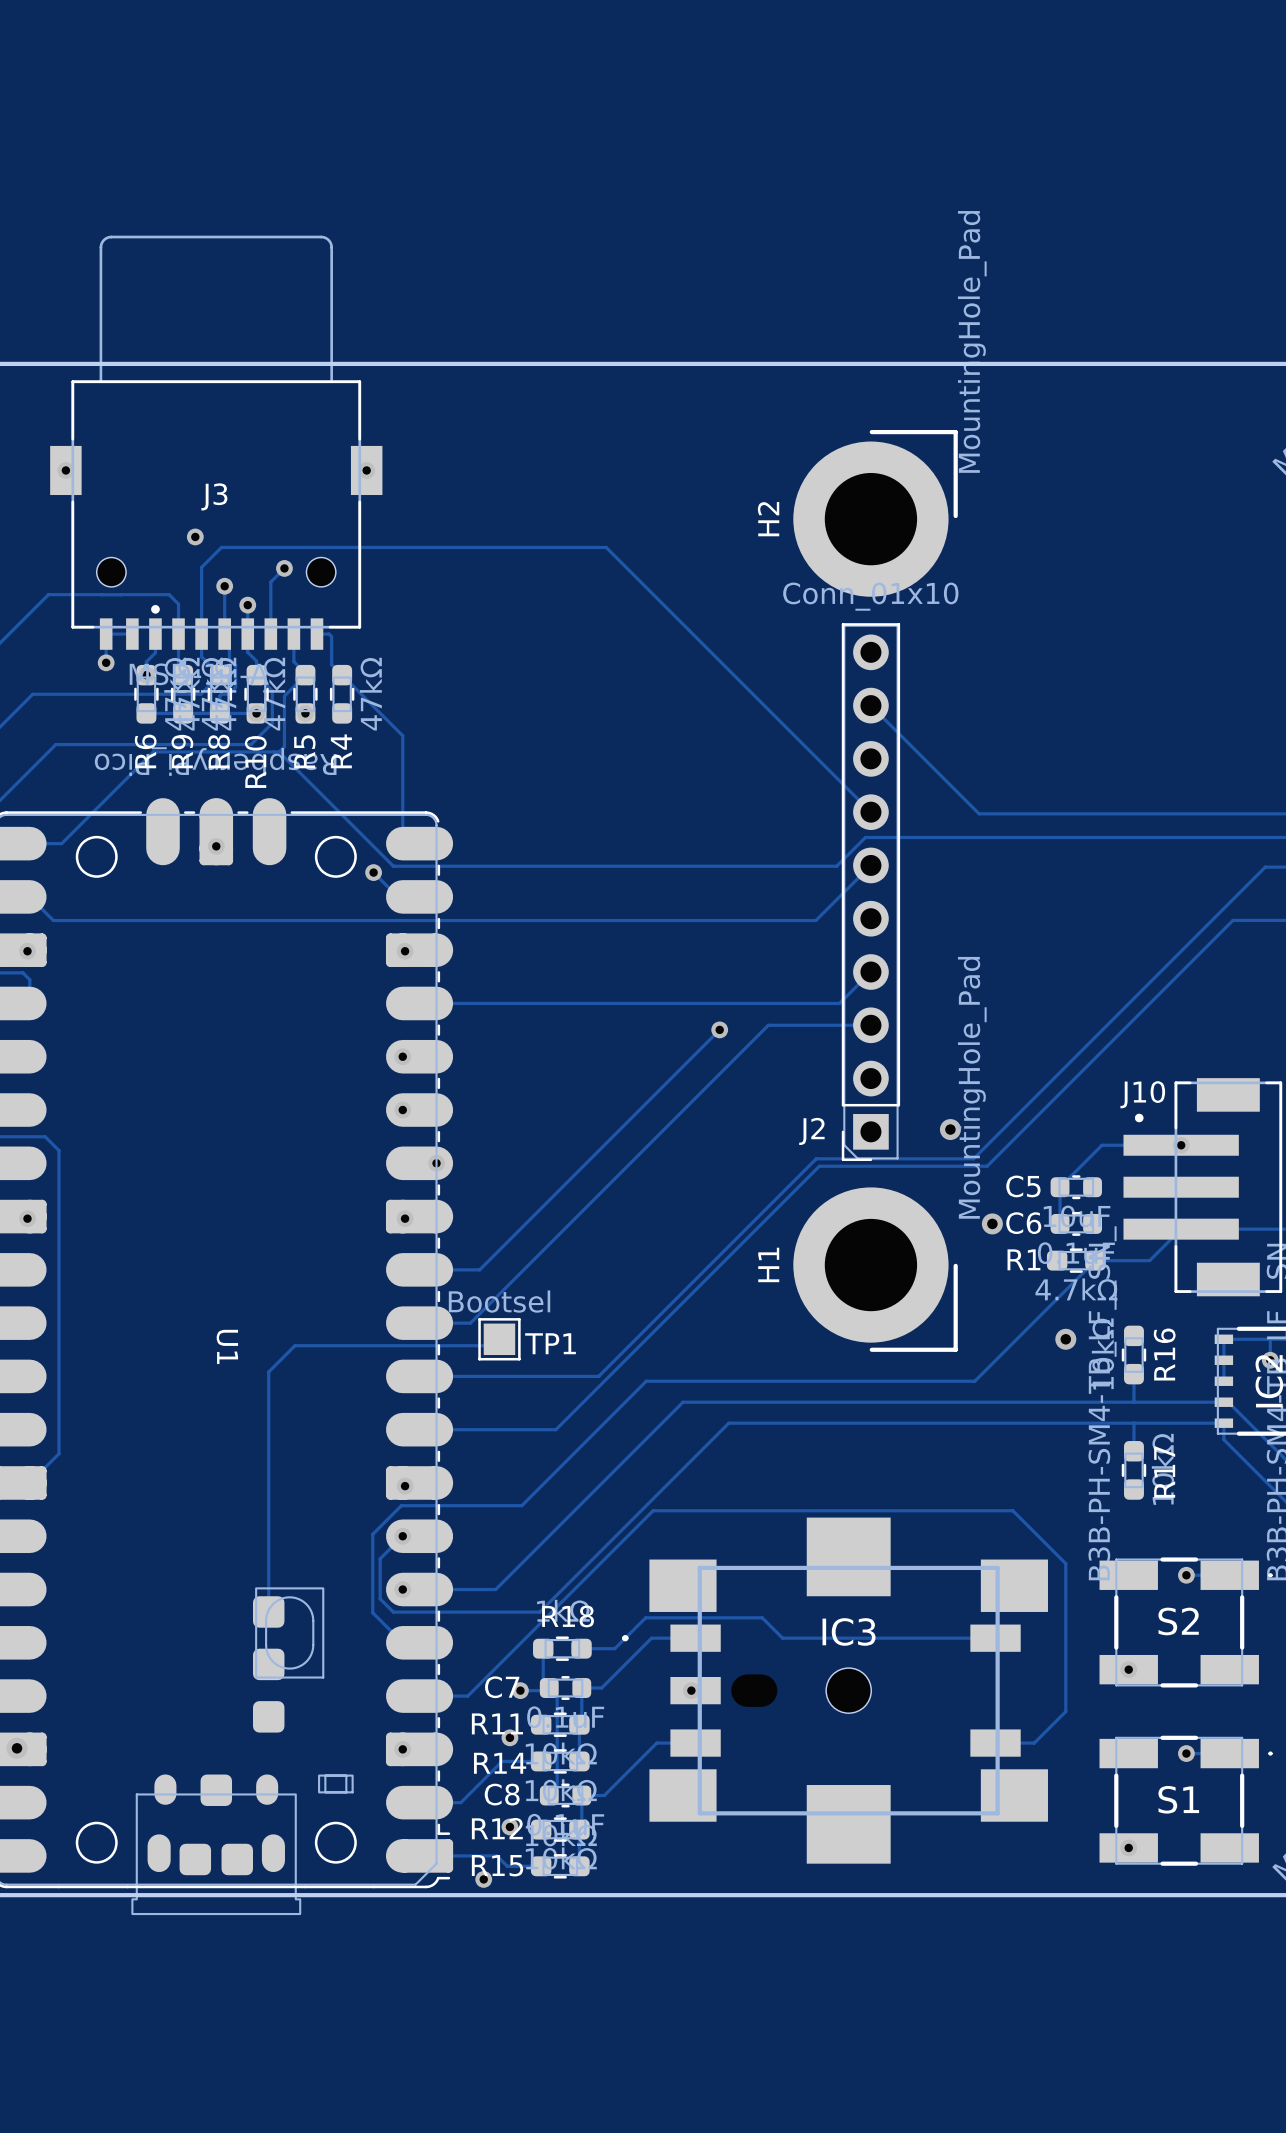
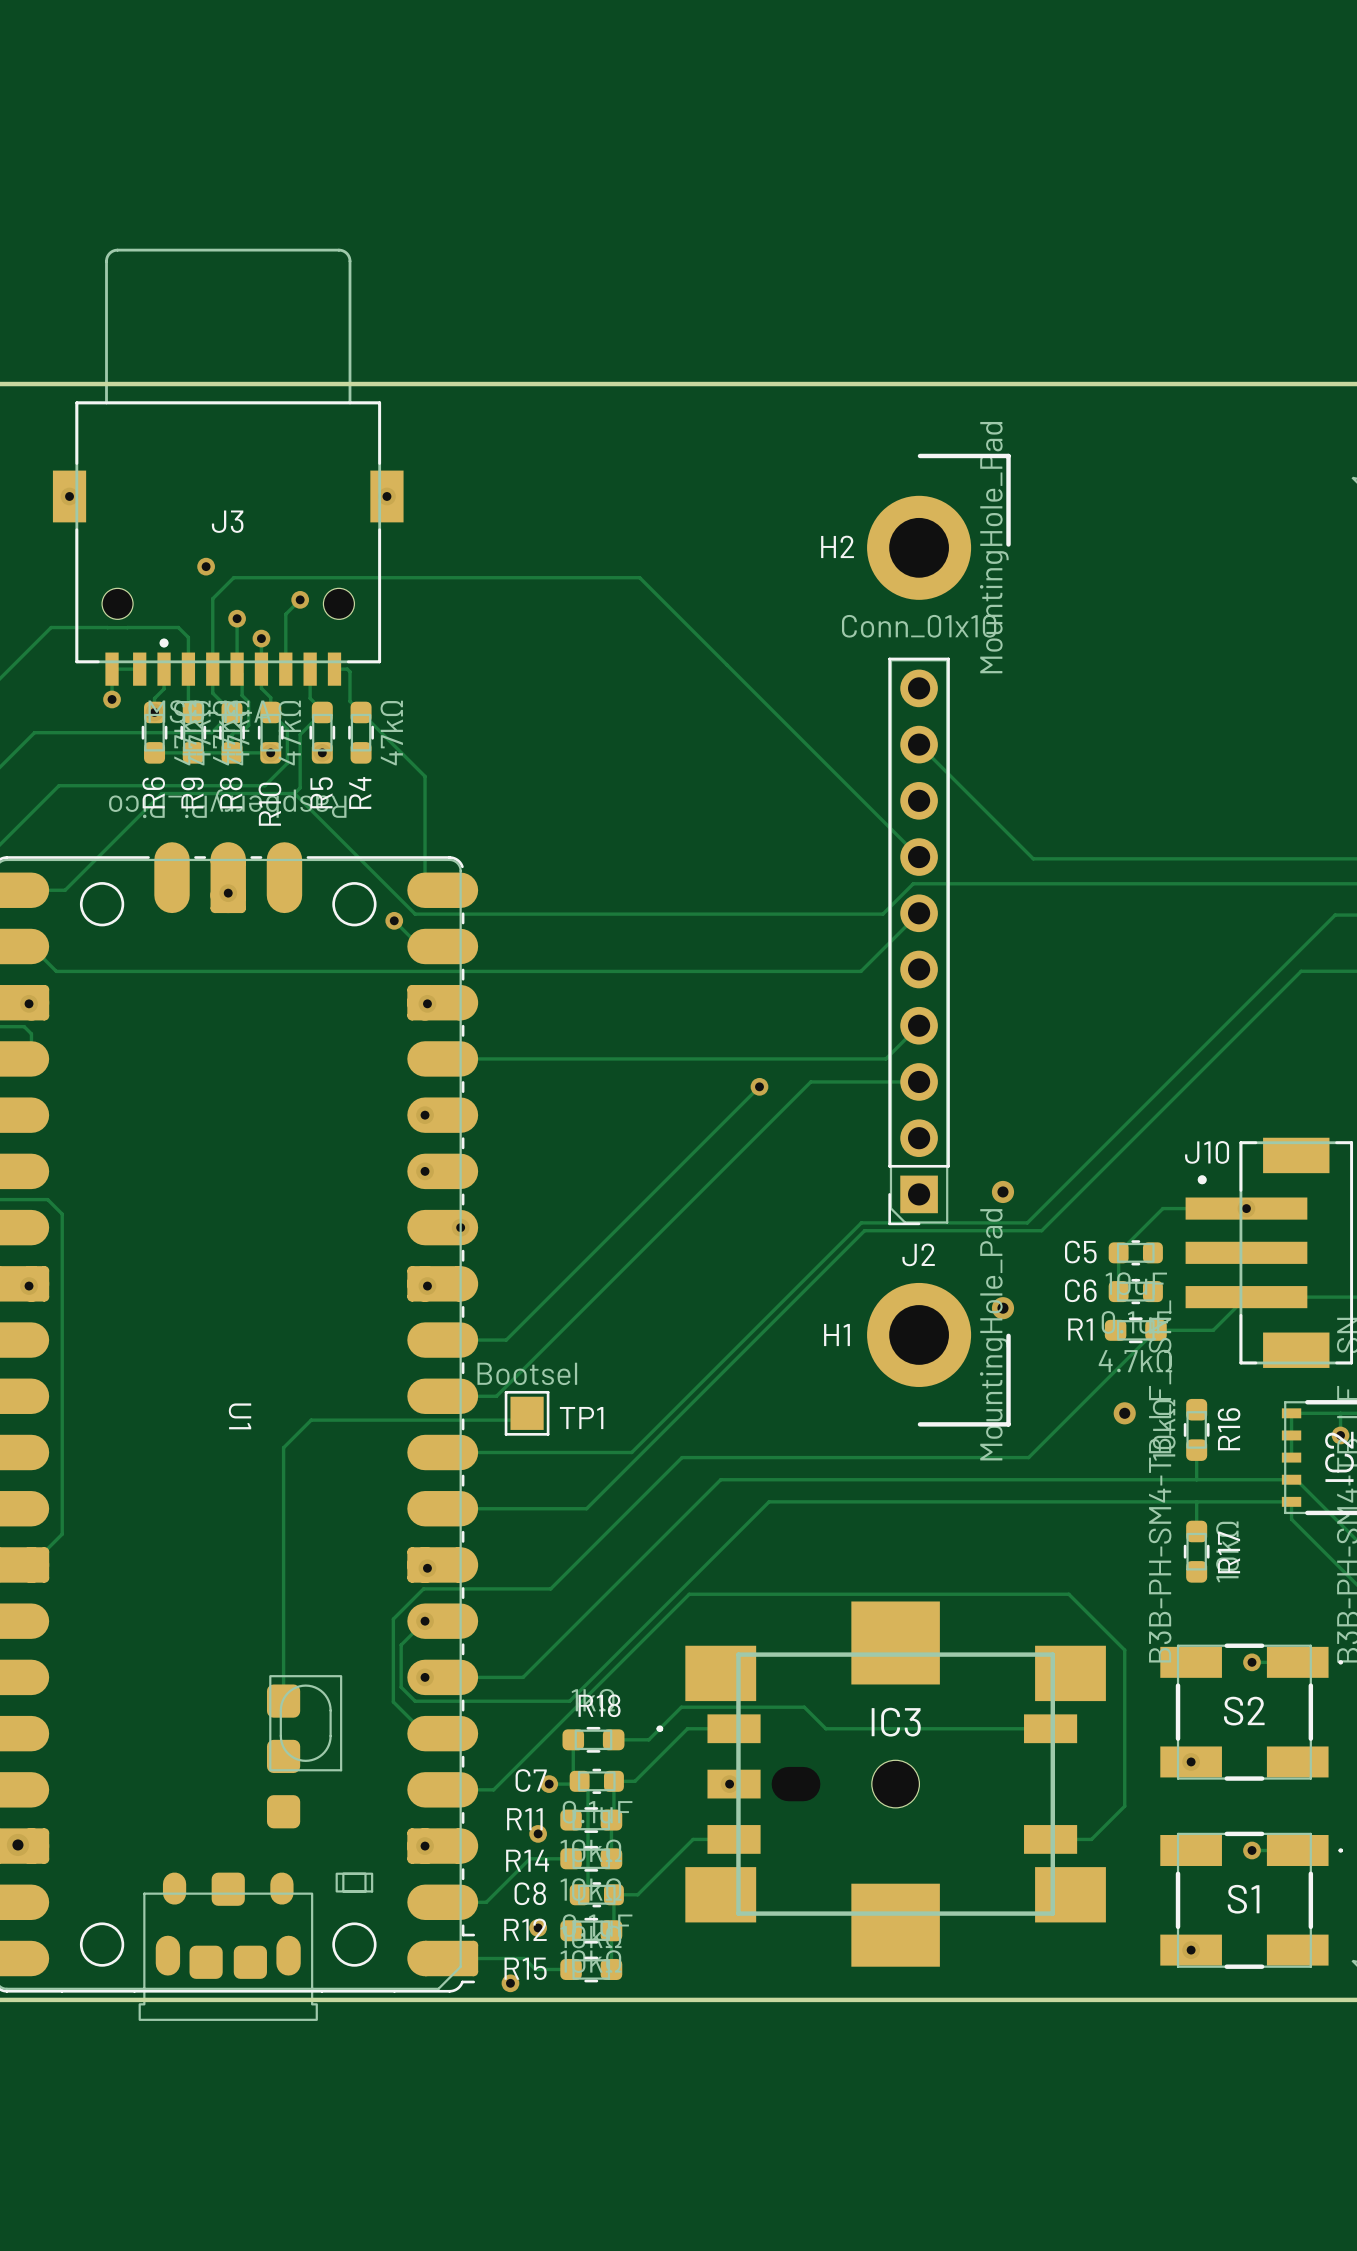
H2 value position: MountingHole_Pad (972, 341) -> MountingHole_Pad (994, 547)
H2 footprint: [793, 441, 949, 597] -> [867, 495, 972, 600]
H1 value position: MountingHole_Pad (972, 1087) -> MountingHole_Pad (994, 1334)
J2 name position: J2 (811, 1131) -> J2 (918, 1254)
H1 footprint: [793, 1187, 949, 1343] -> [867, 1282, 972, 1387]
via position: (992, 1223) -> (1002, 1308)

